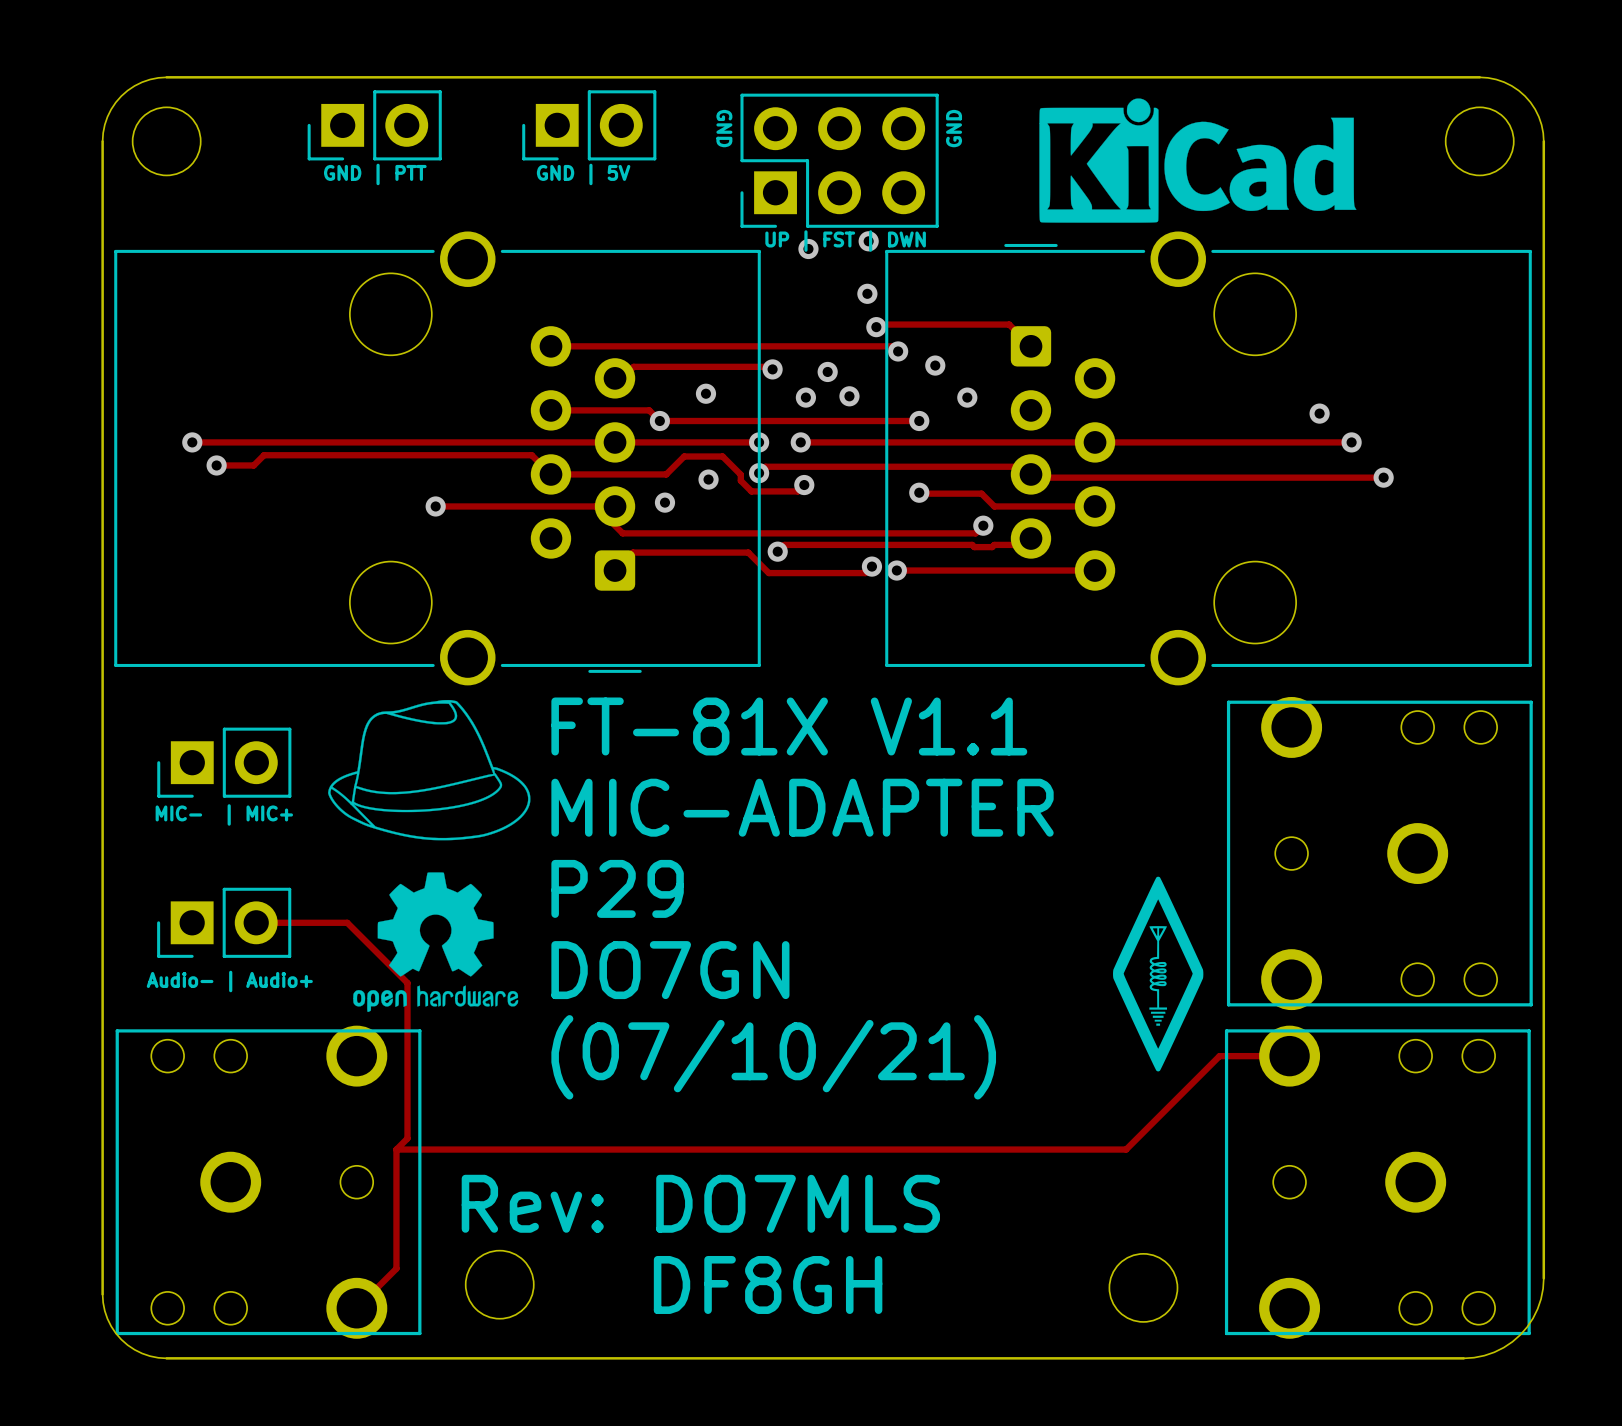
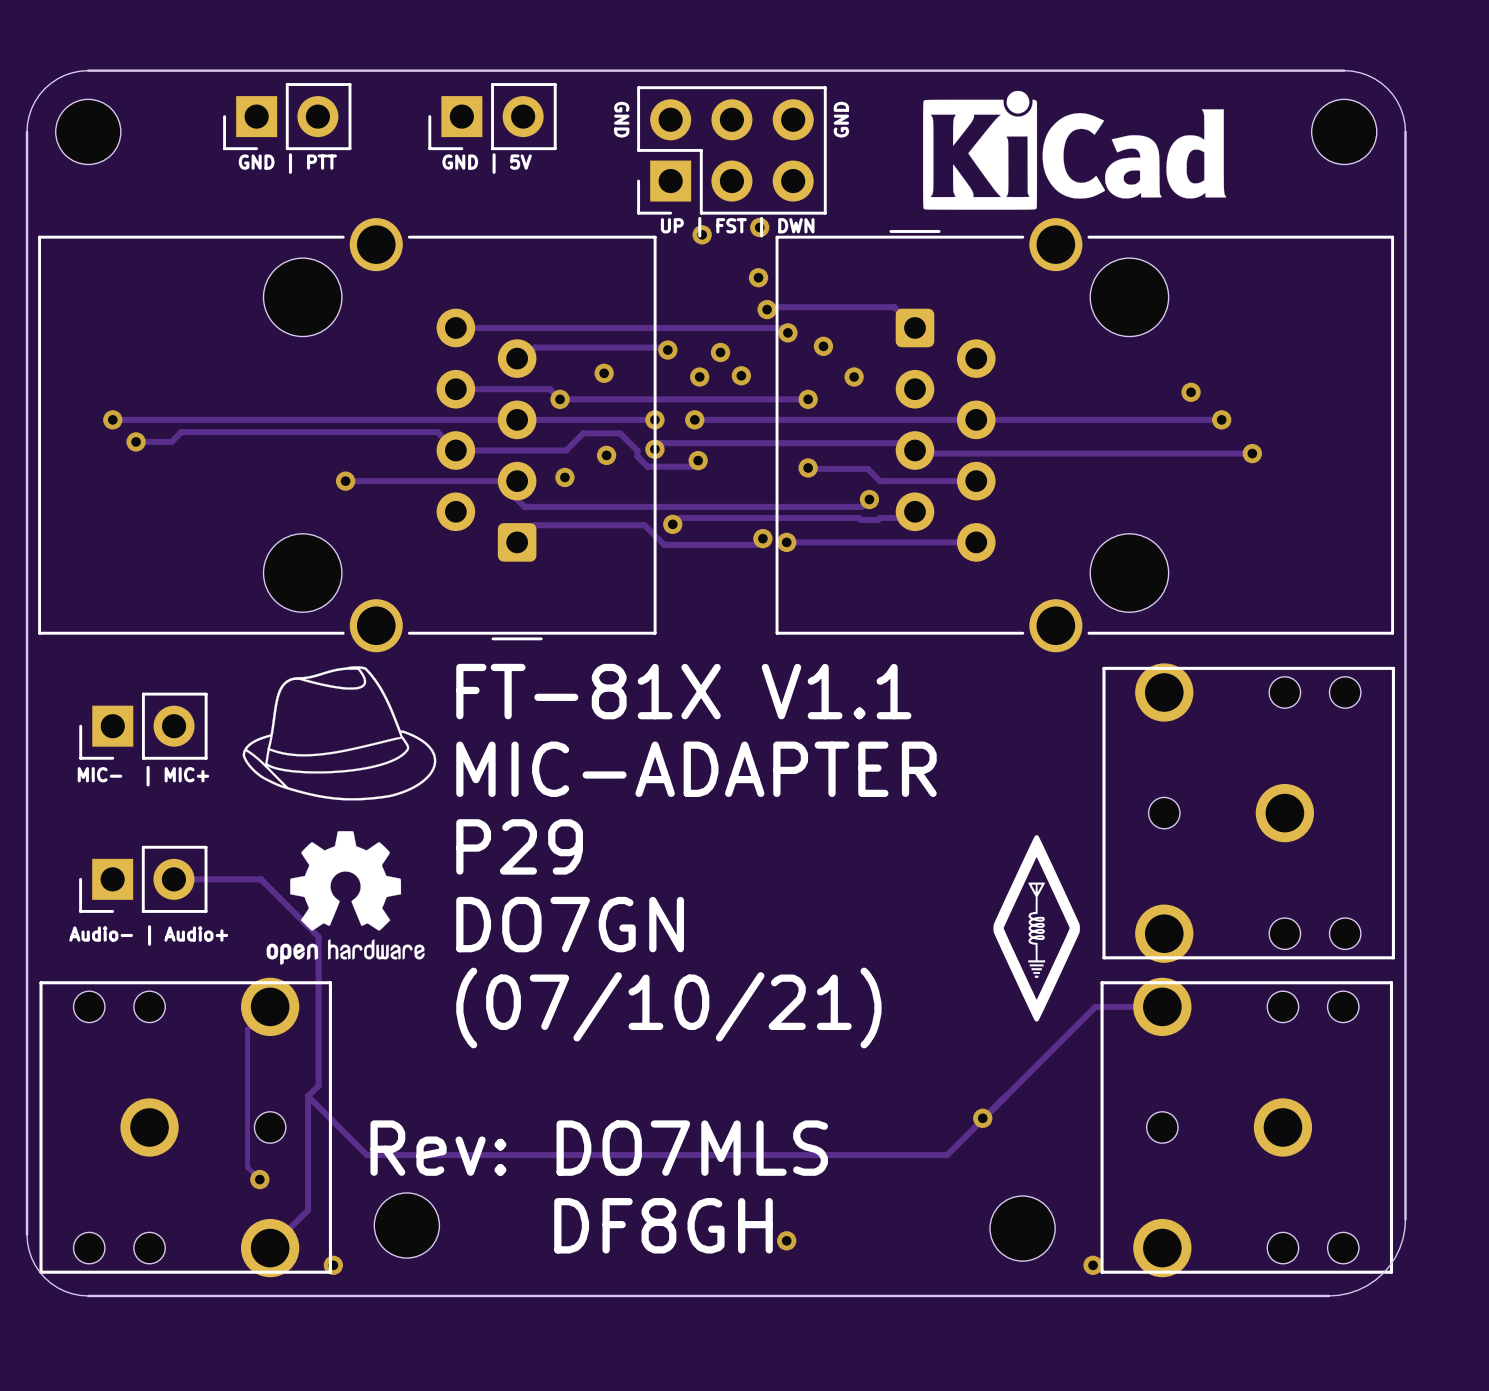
track: none -> (270, 1006) (247, 1029) (247, 1167) (259, 1179)
track: (396, 1149) (1126, 1149) -> (308, 1096) (366, 1155) (947, 1155) (1006, 1096)
via: none -> (982, 1118)
via: none -> (259, 1179)
via: none -> (786, 1240)
via: none -> (333, 1265)
via: none -> (1093, 1265)

